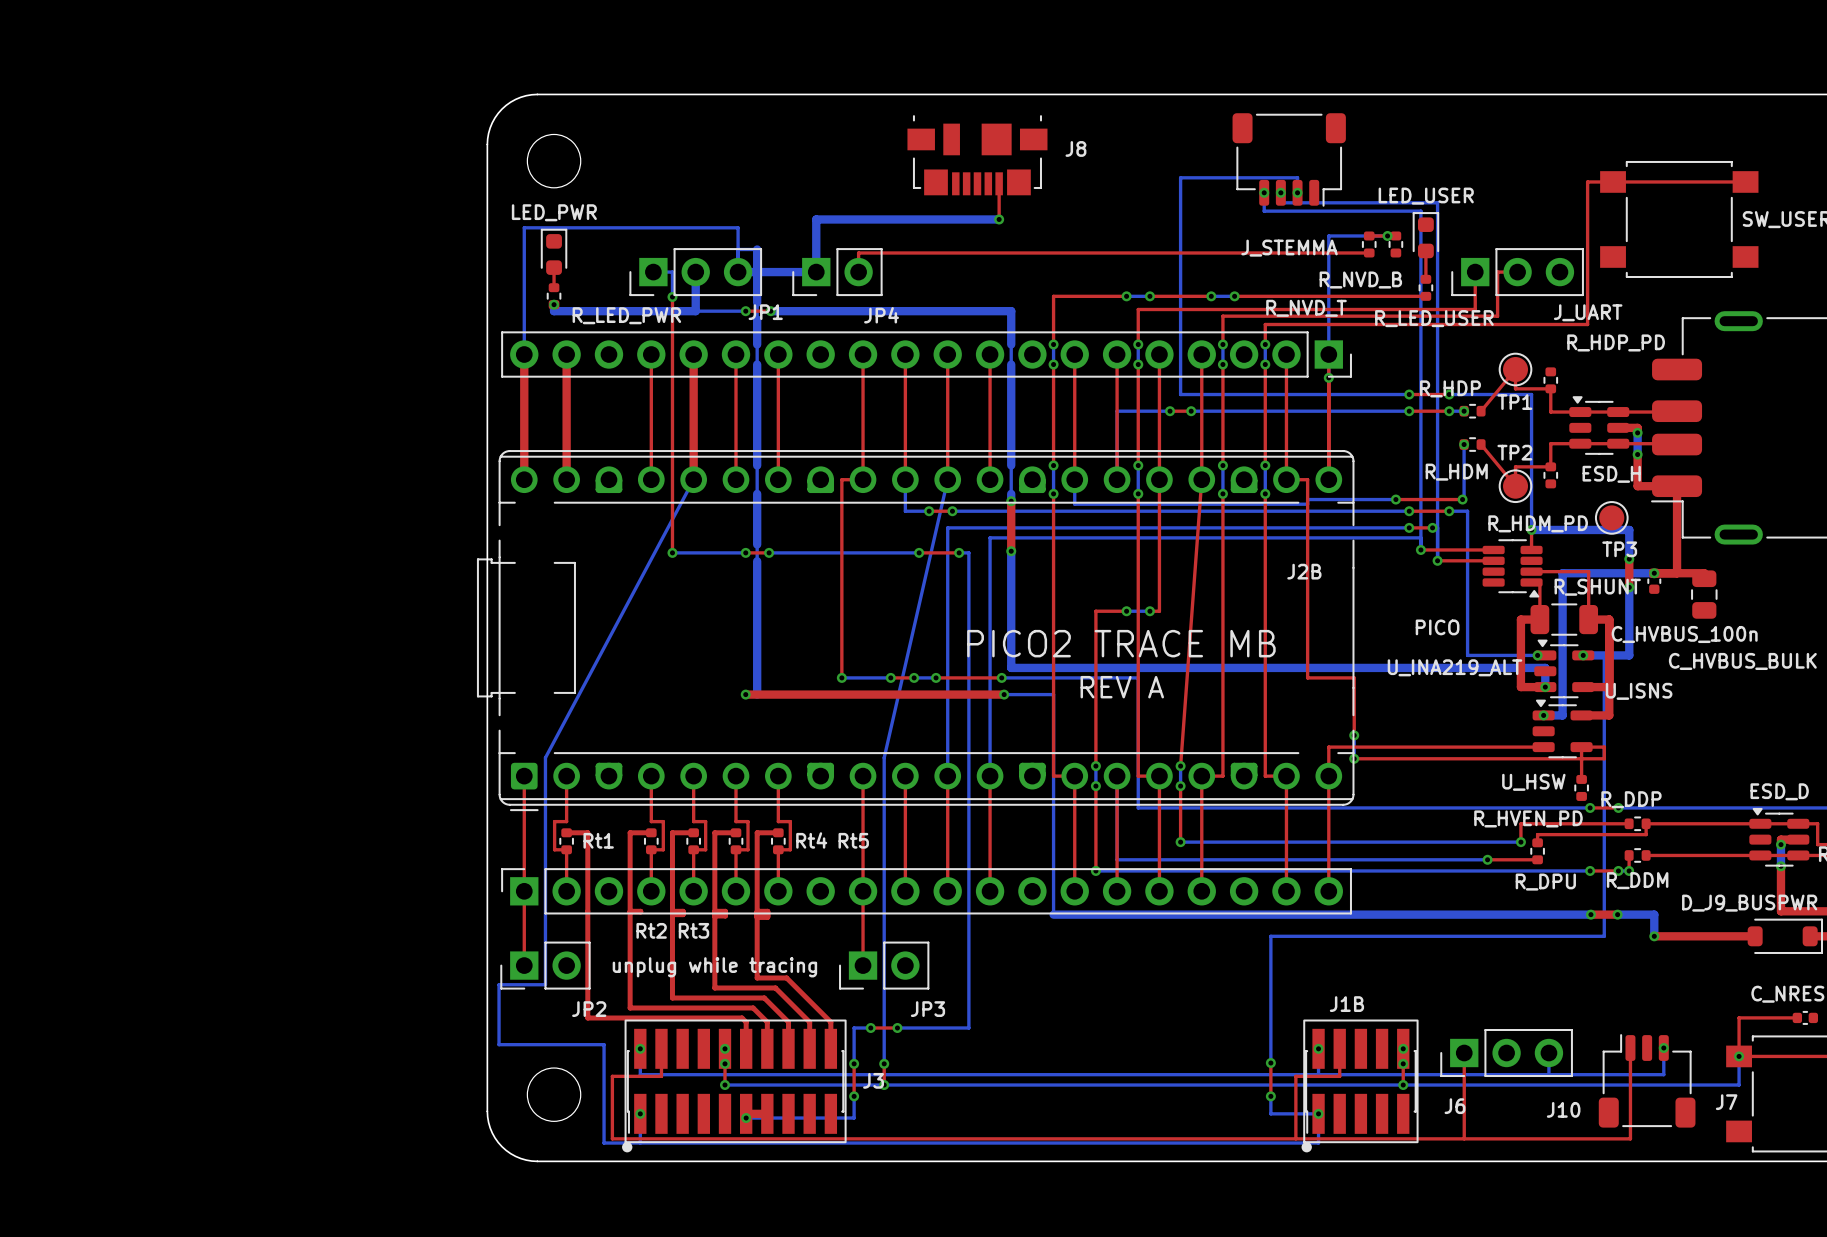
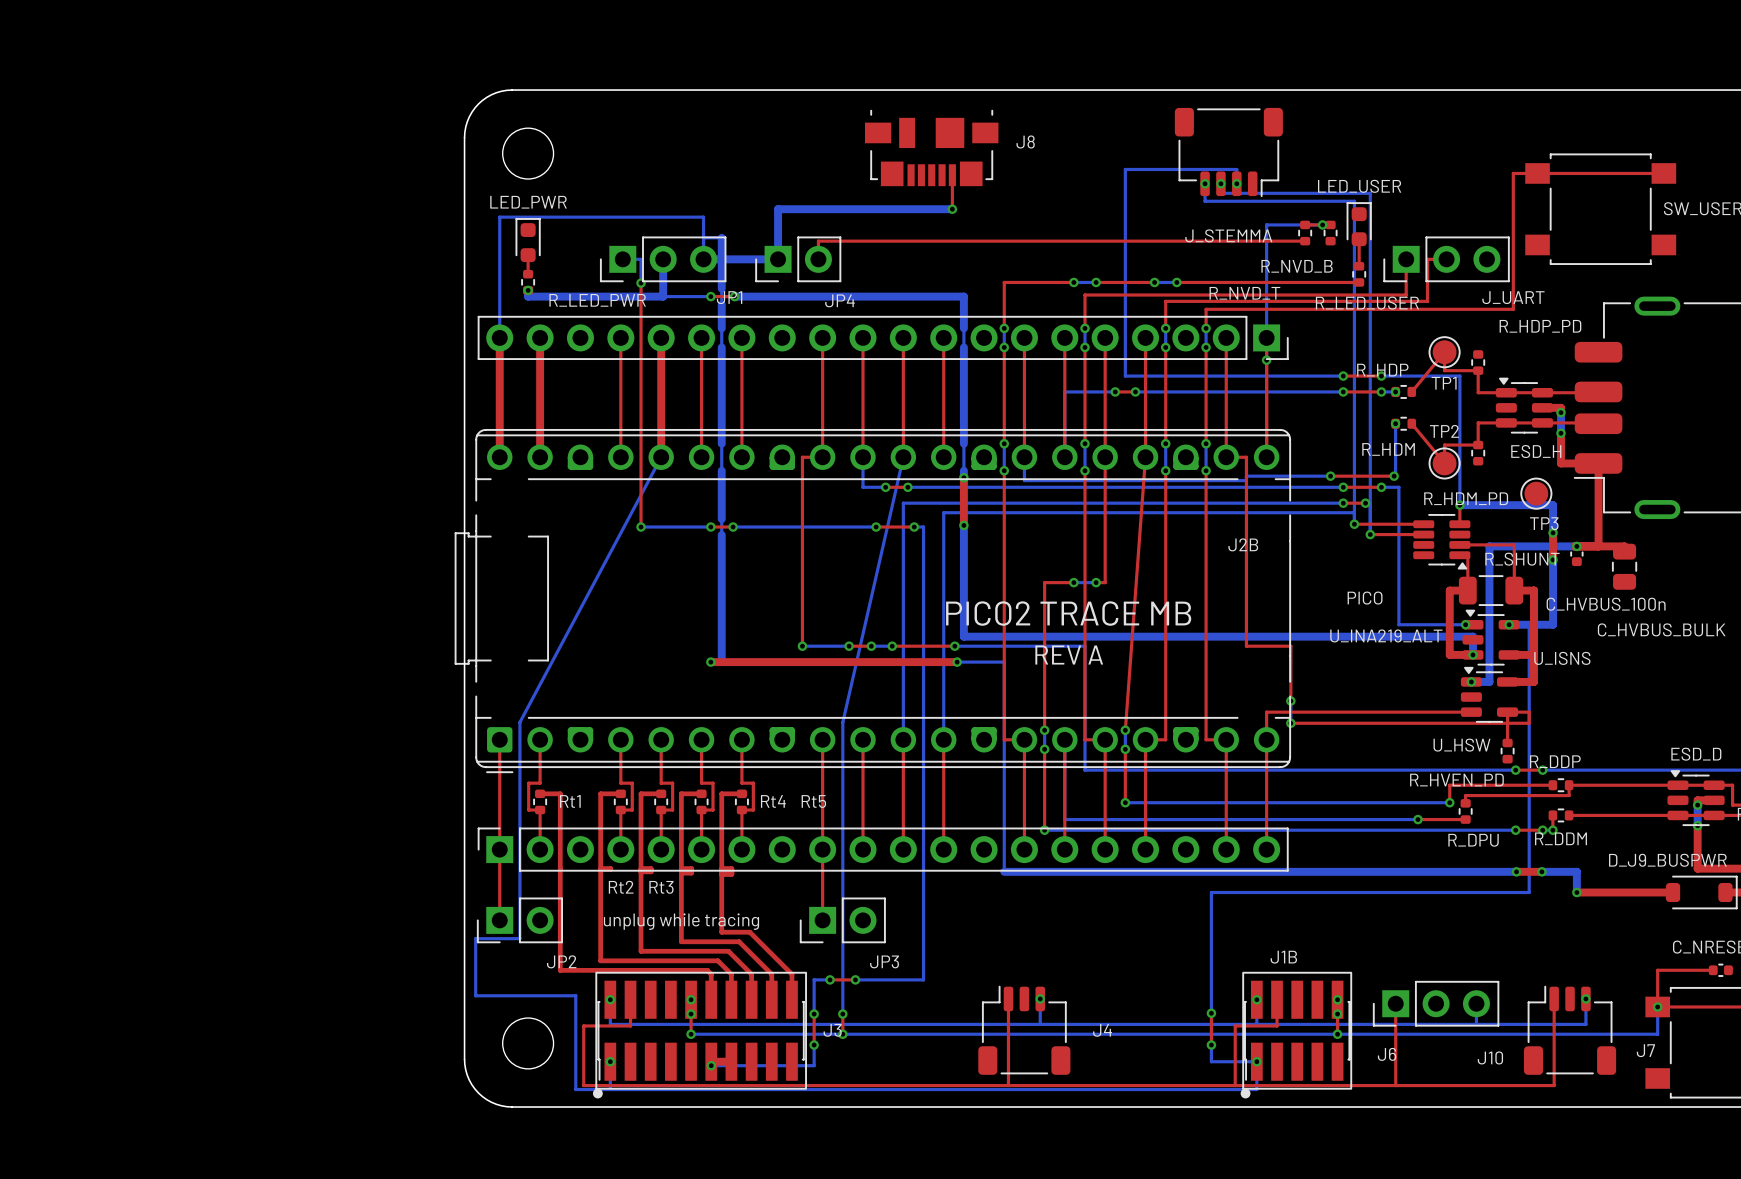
top track: none -> (1008, 998) (1008, 1085)
bottom track: none -> (1040, 998) (1040, 1024)
via: none -> (1040, 998)
J4: none -> (1024, 1030)

